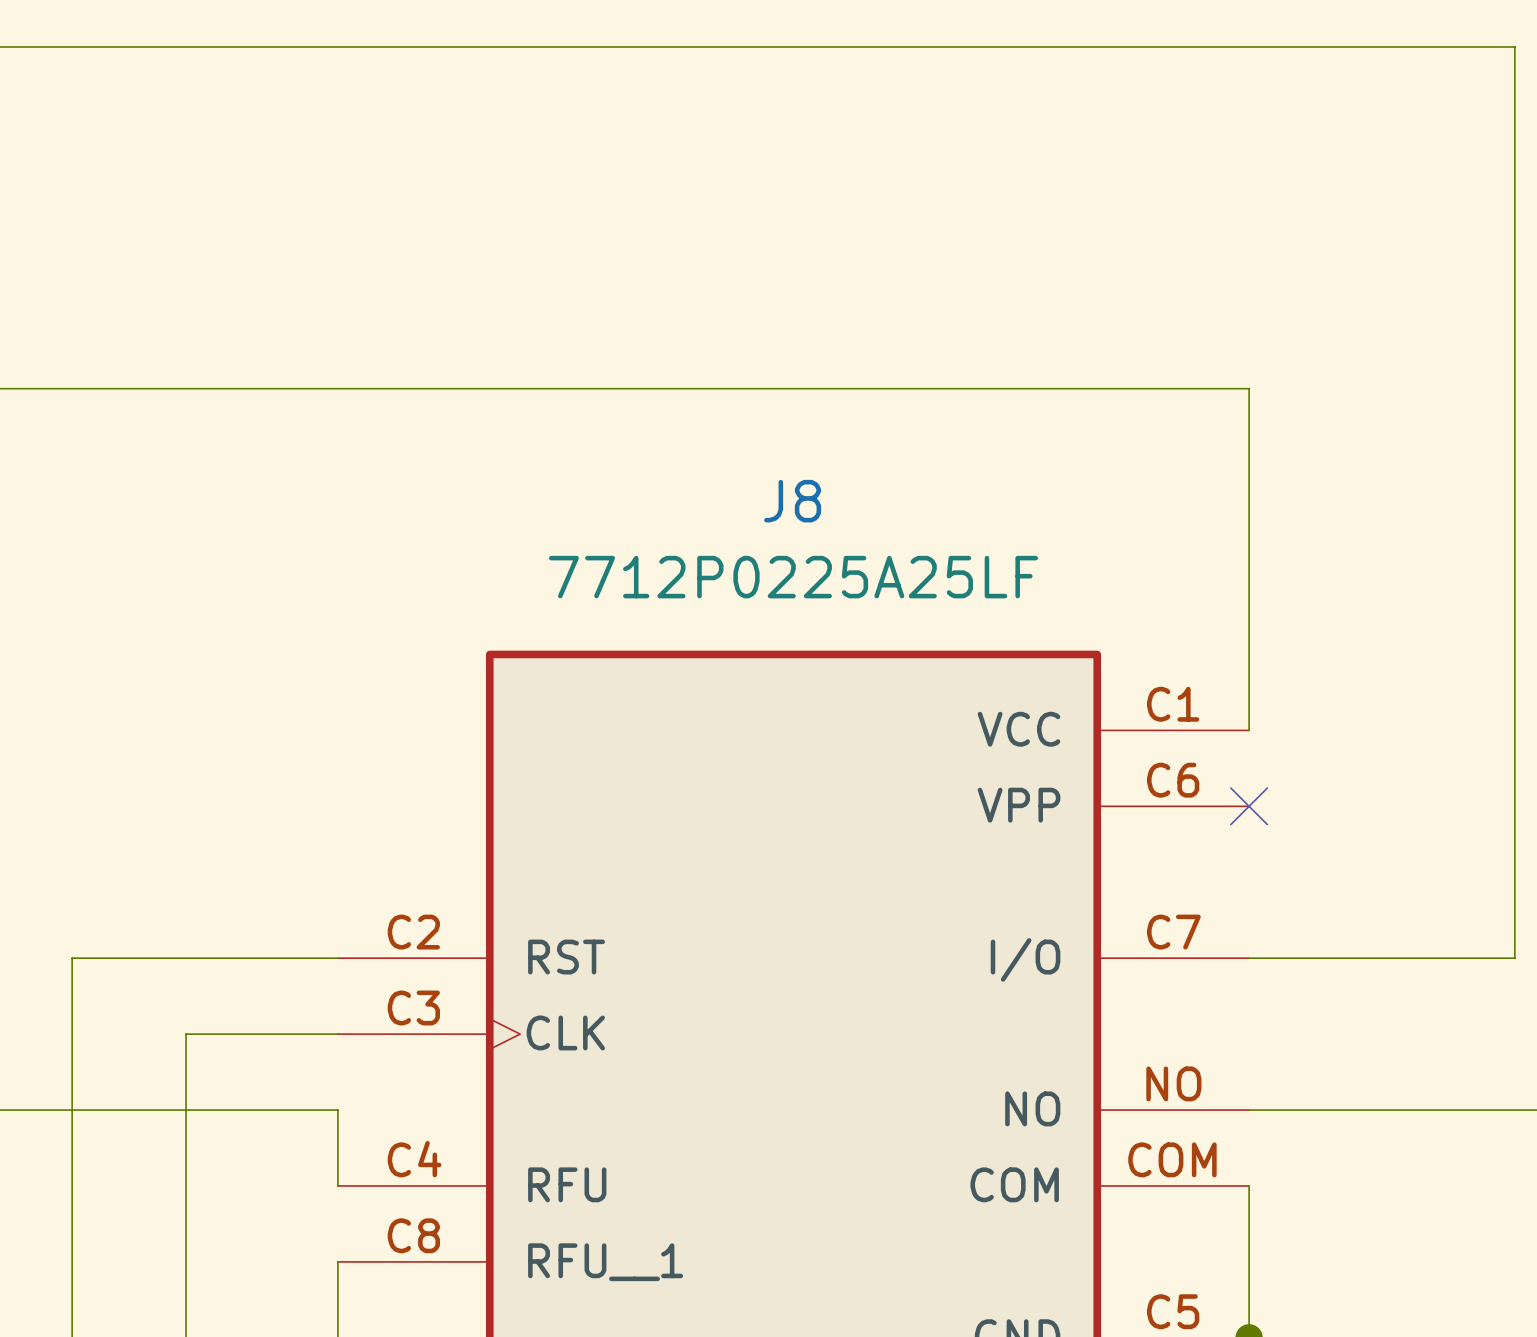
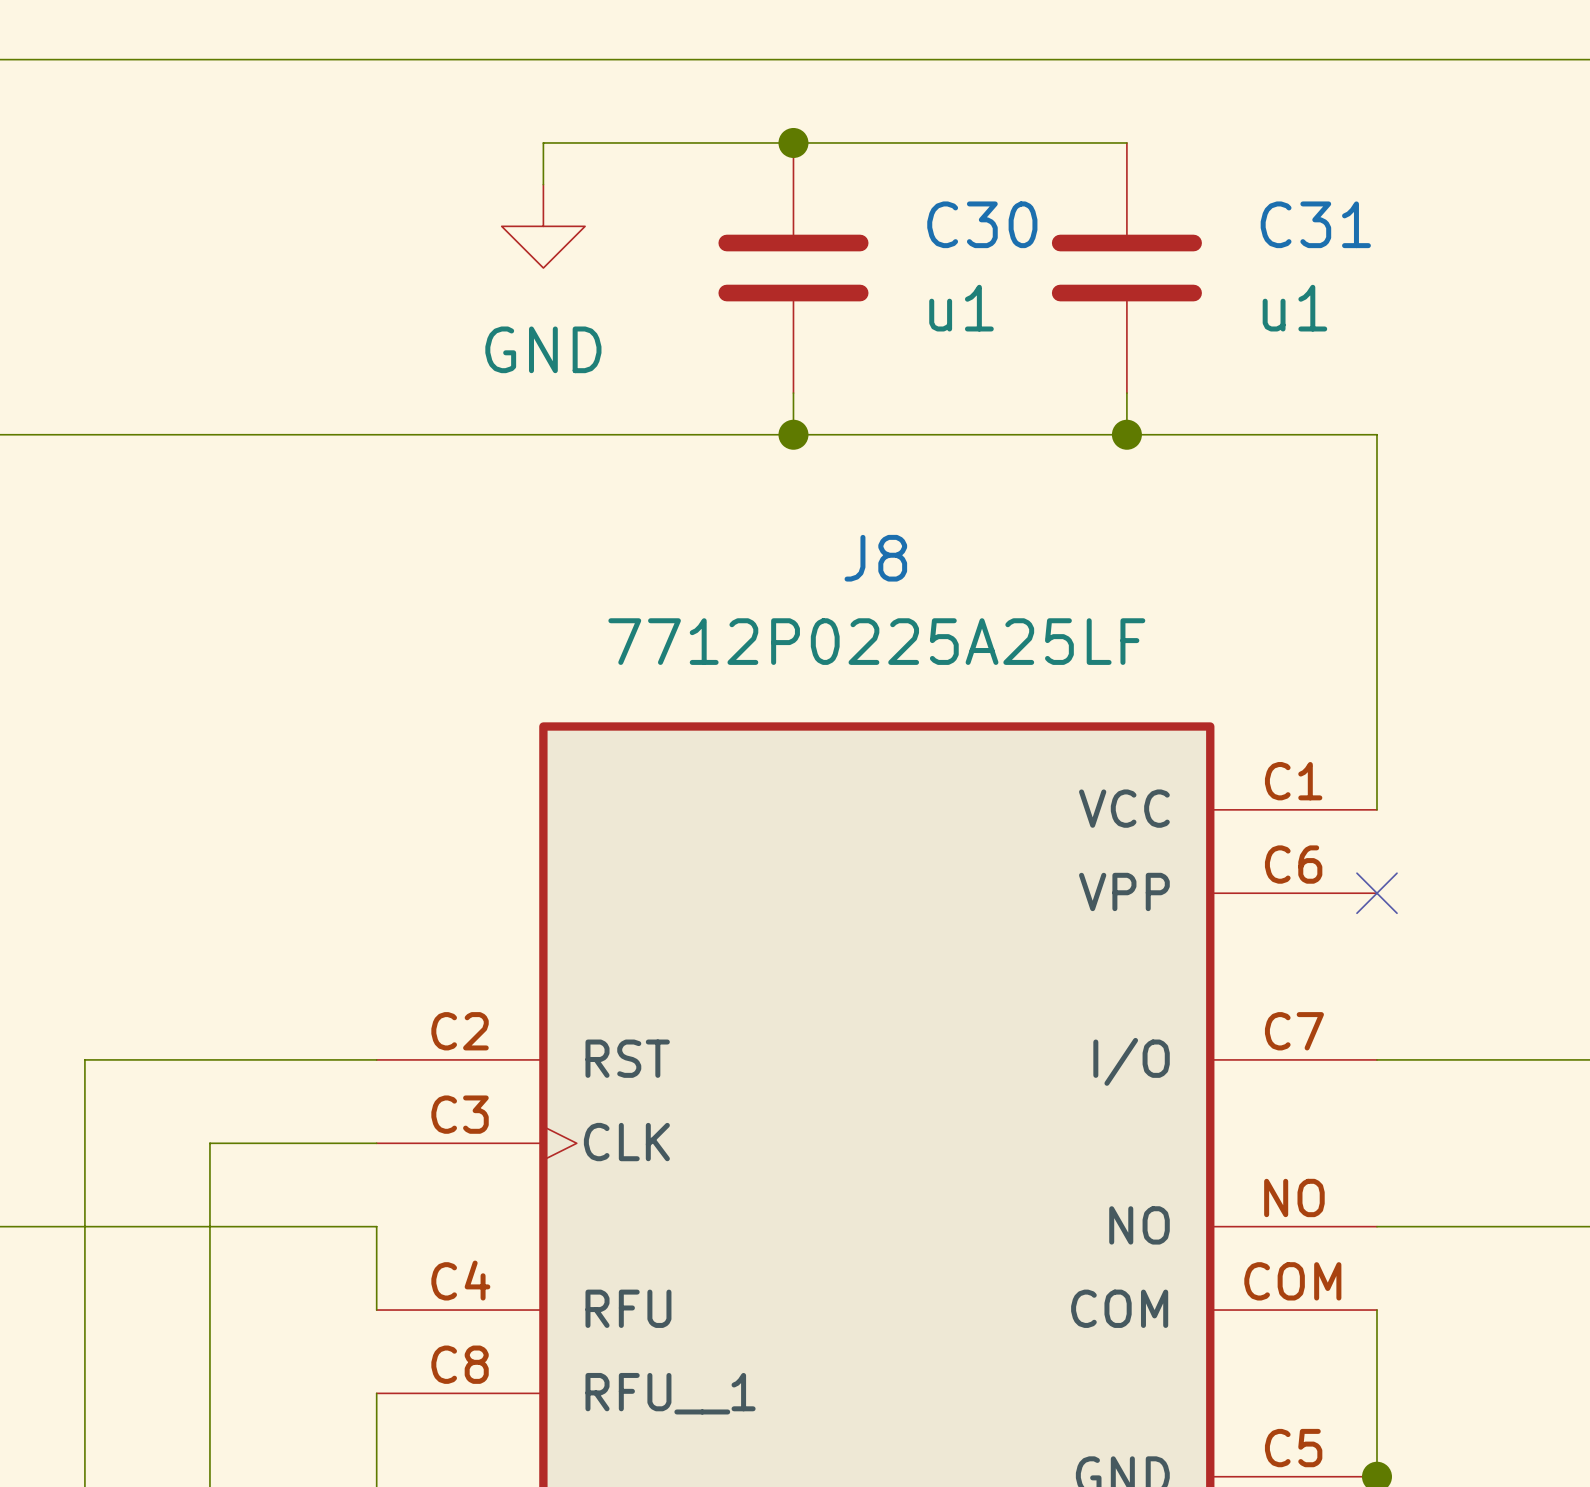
junction: none -> (793, 142)
wire: none -> (1126, 142) (543, 142) (543, 184)
power symbol: none -> GND (543, 226)
C30: none -> u1 (793, 268)
C31: none -> u1 (1126, 268)
wire: none -> (793, 393) (793, 434)
wire: none -> (1126, 393) (1126, 434)
junction: none -> (793, 434)
junction: none -> (1126, 434)

